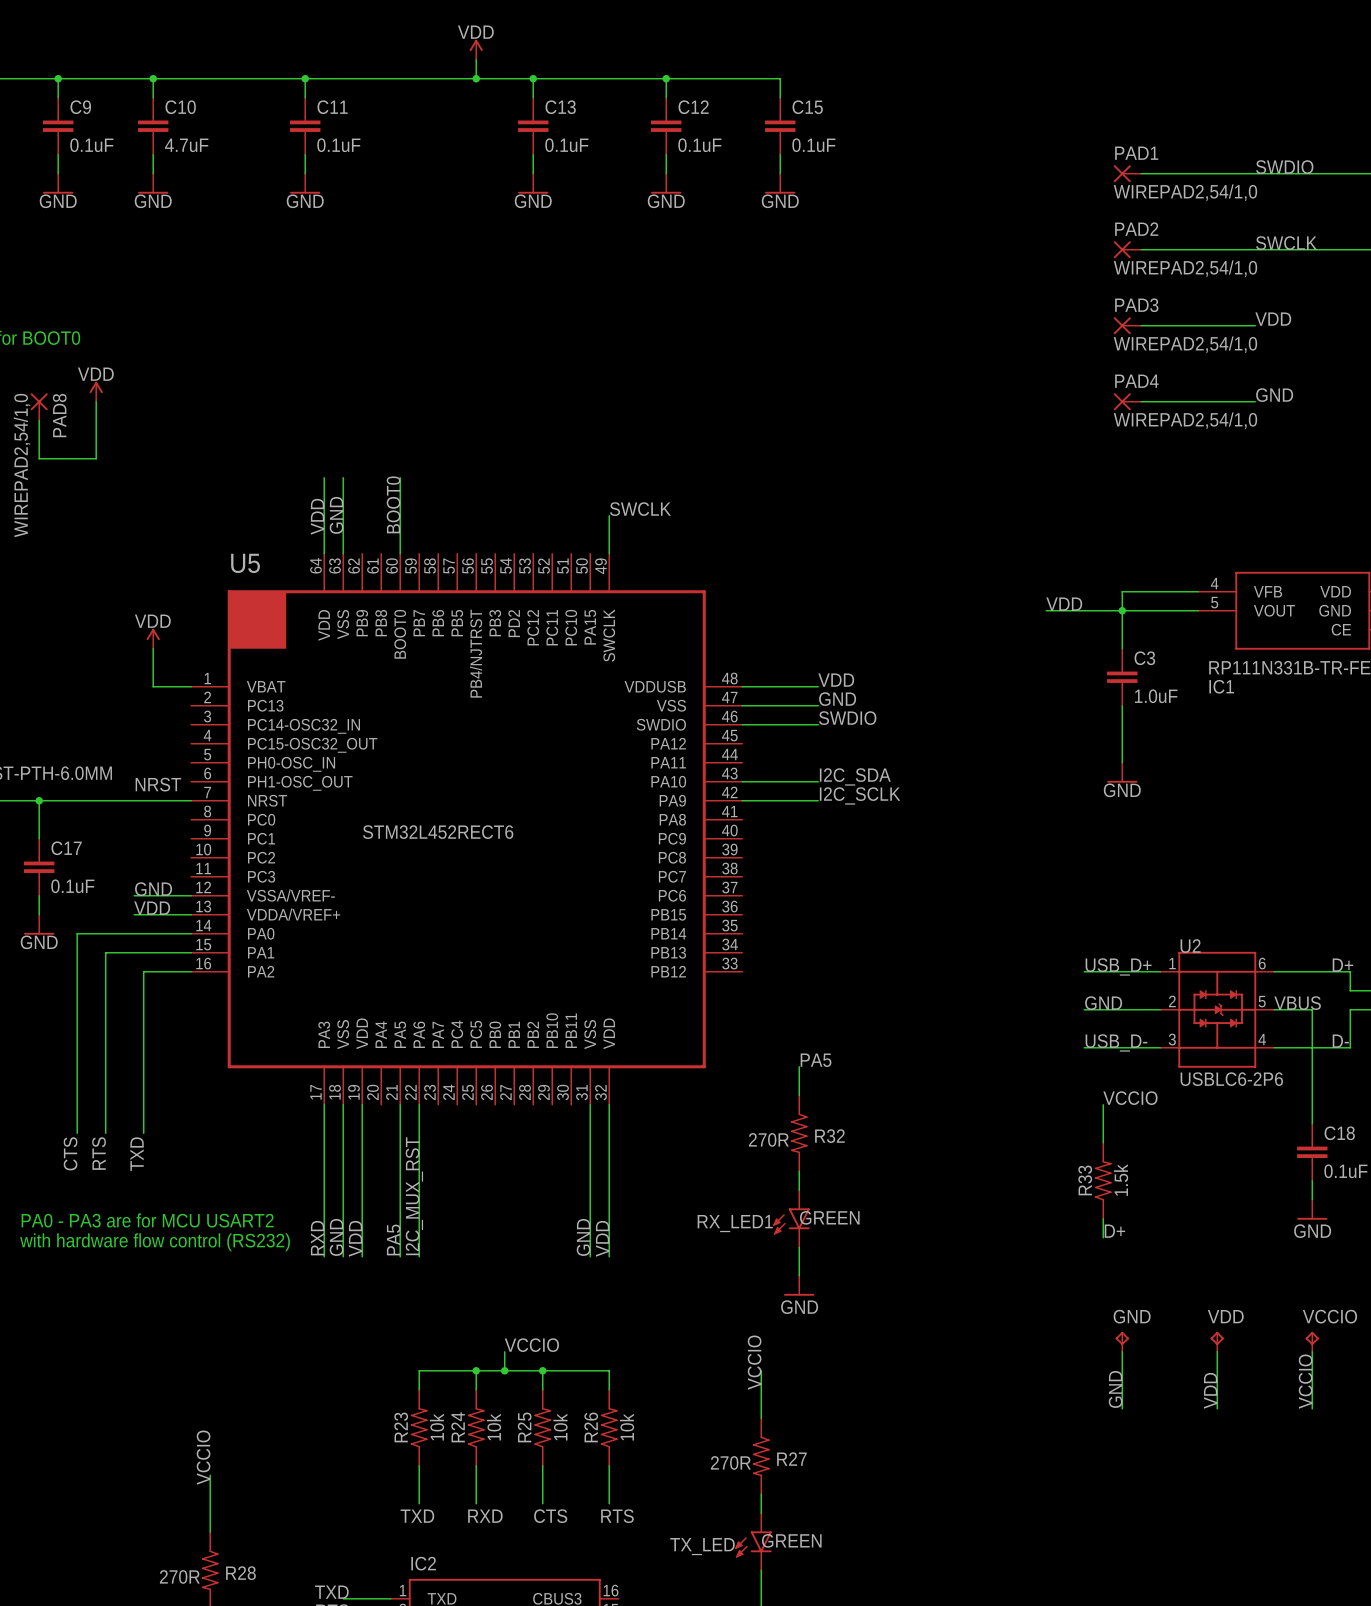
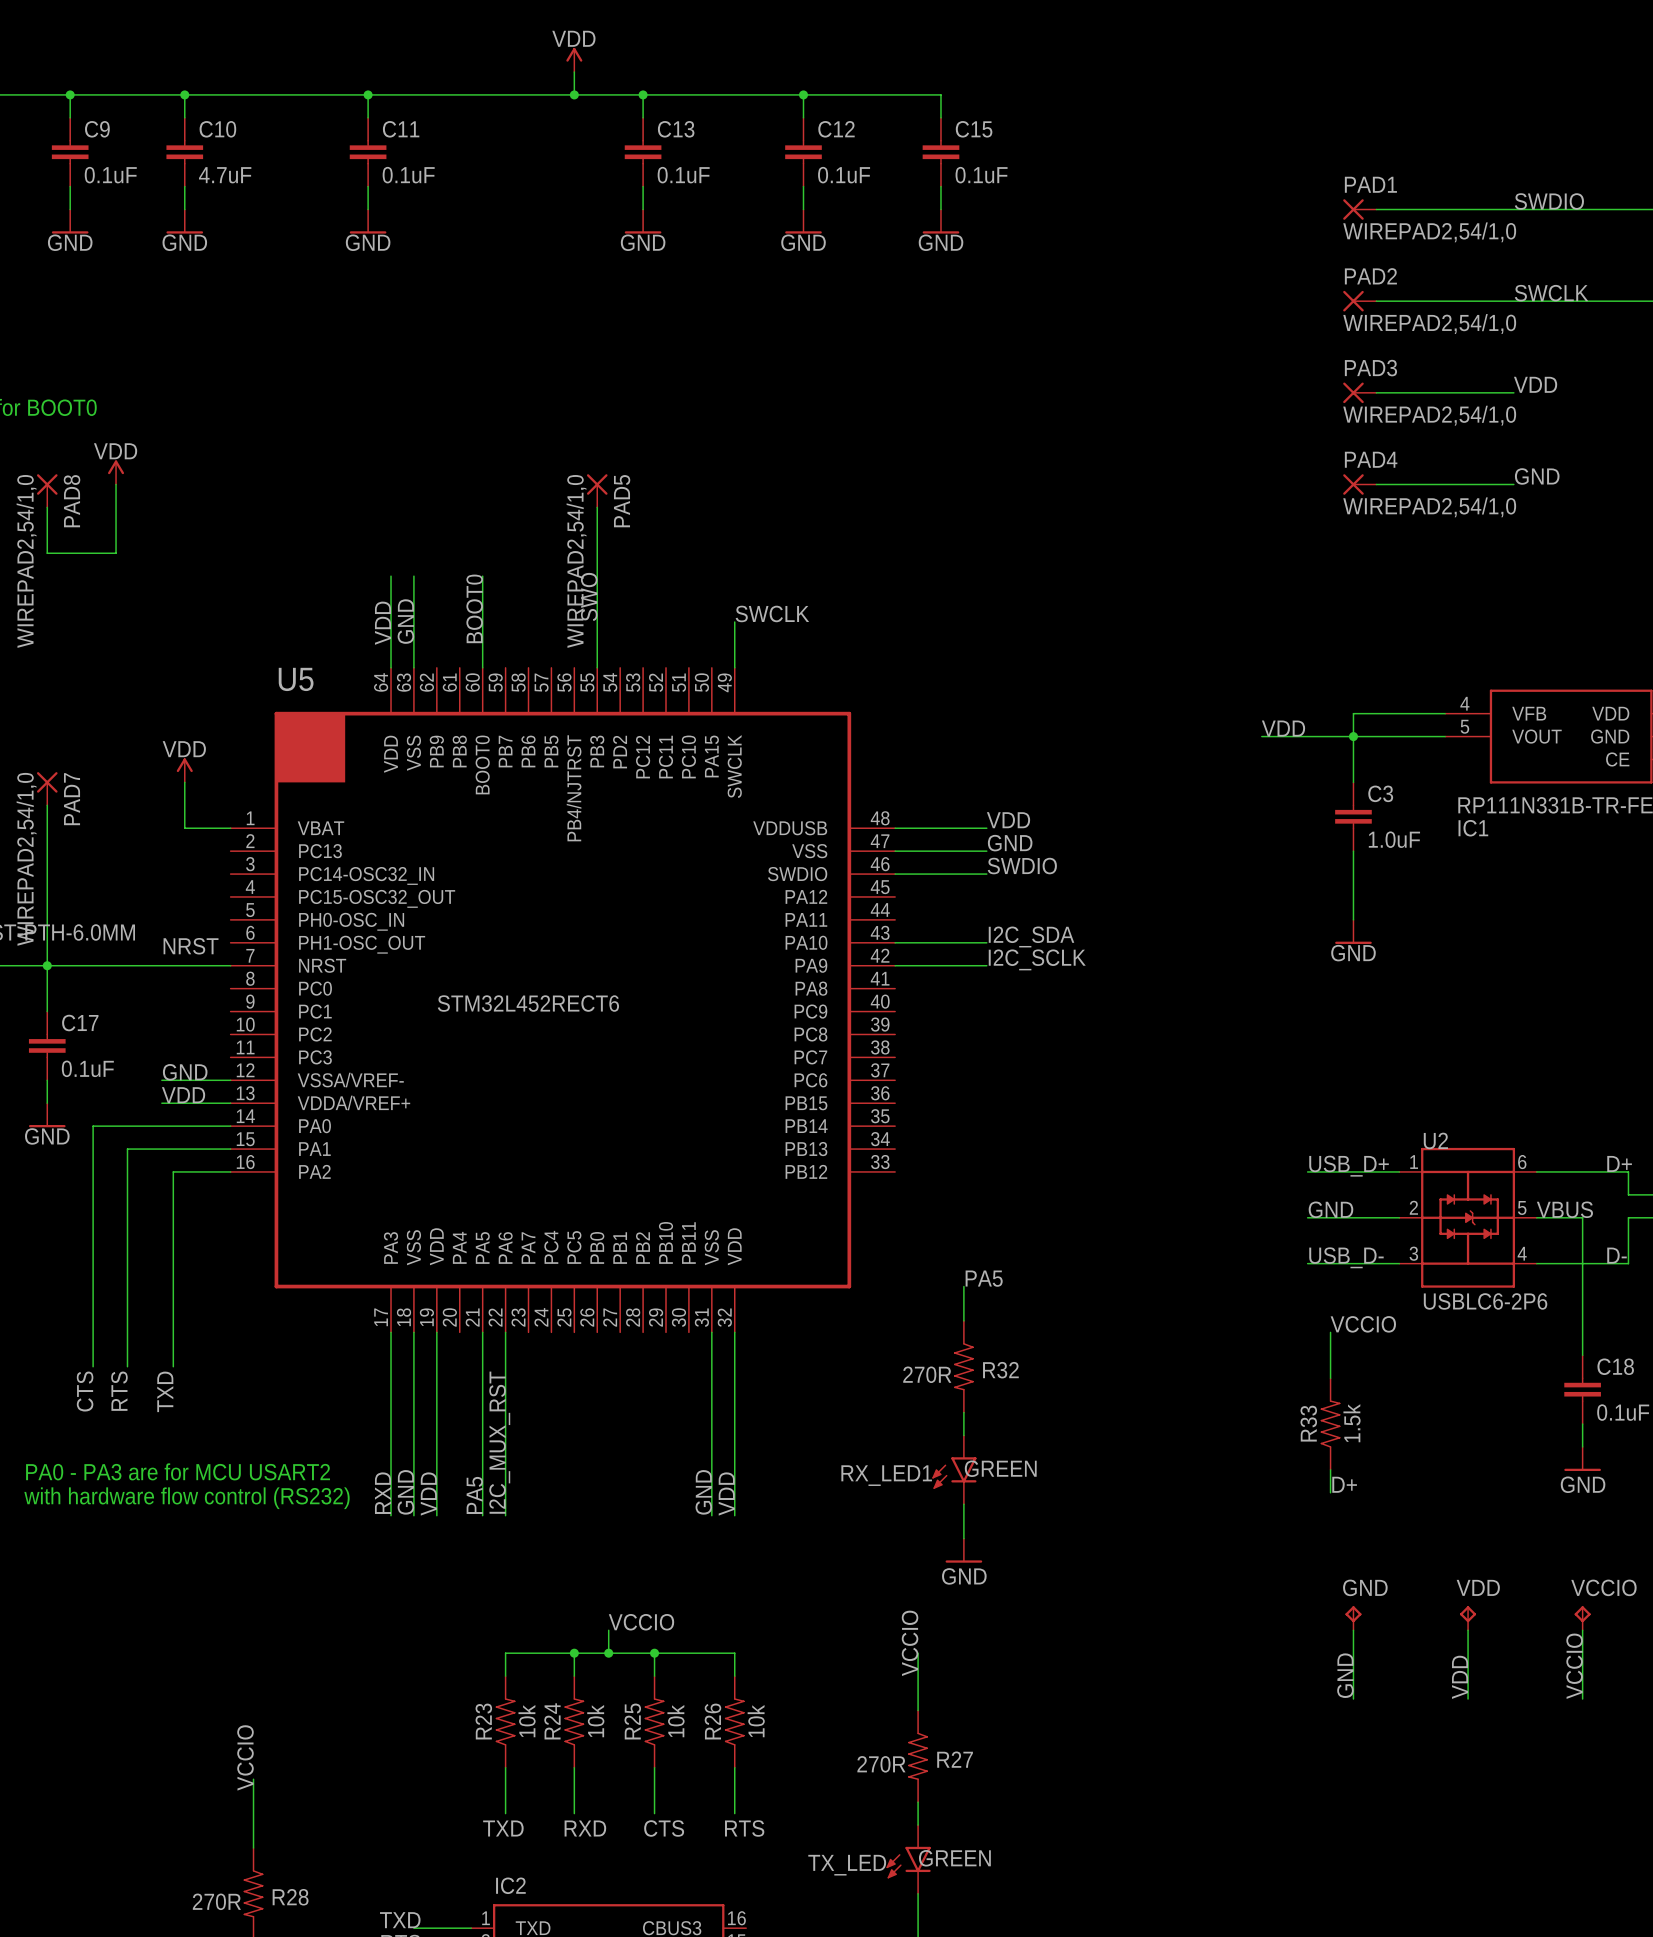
PAD5: none -> WIREPAD2,54/1,0 (597, 490)
wire: none -> (597, 507) (597, 667)
label: none -> SWO (589, 596)
PAD7: none -> WIREPAD2,54/1,0 (47, 788)
wire: none -> (47, 805) (47, 965)

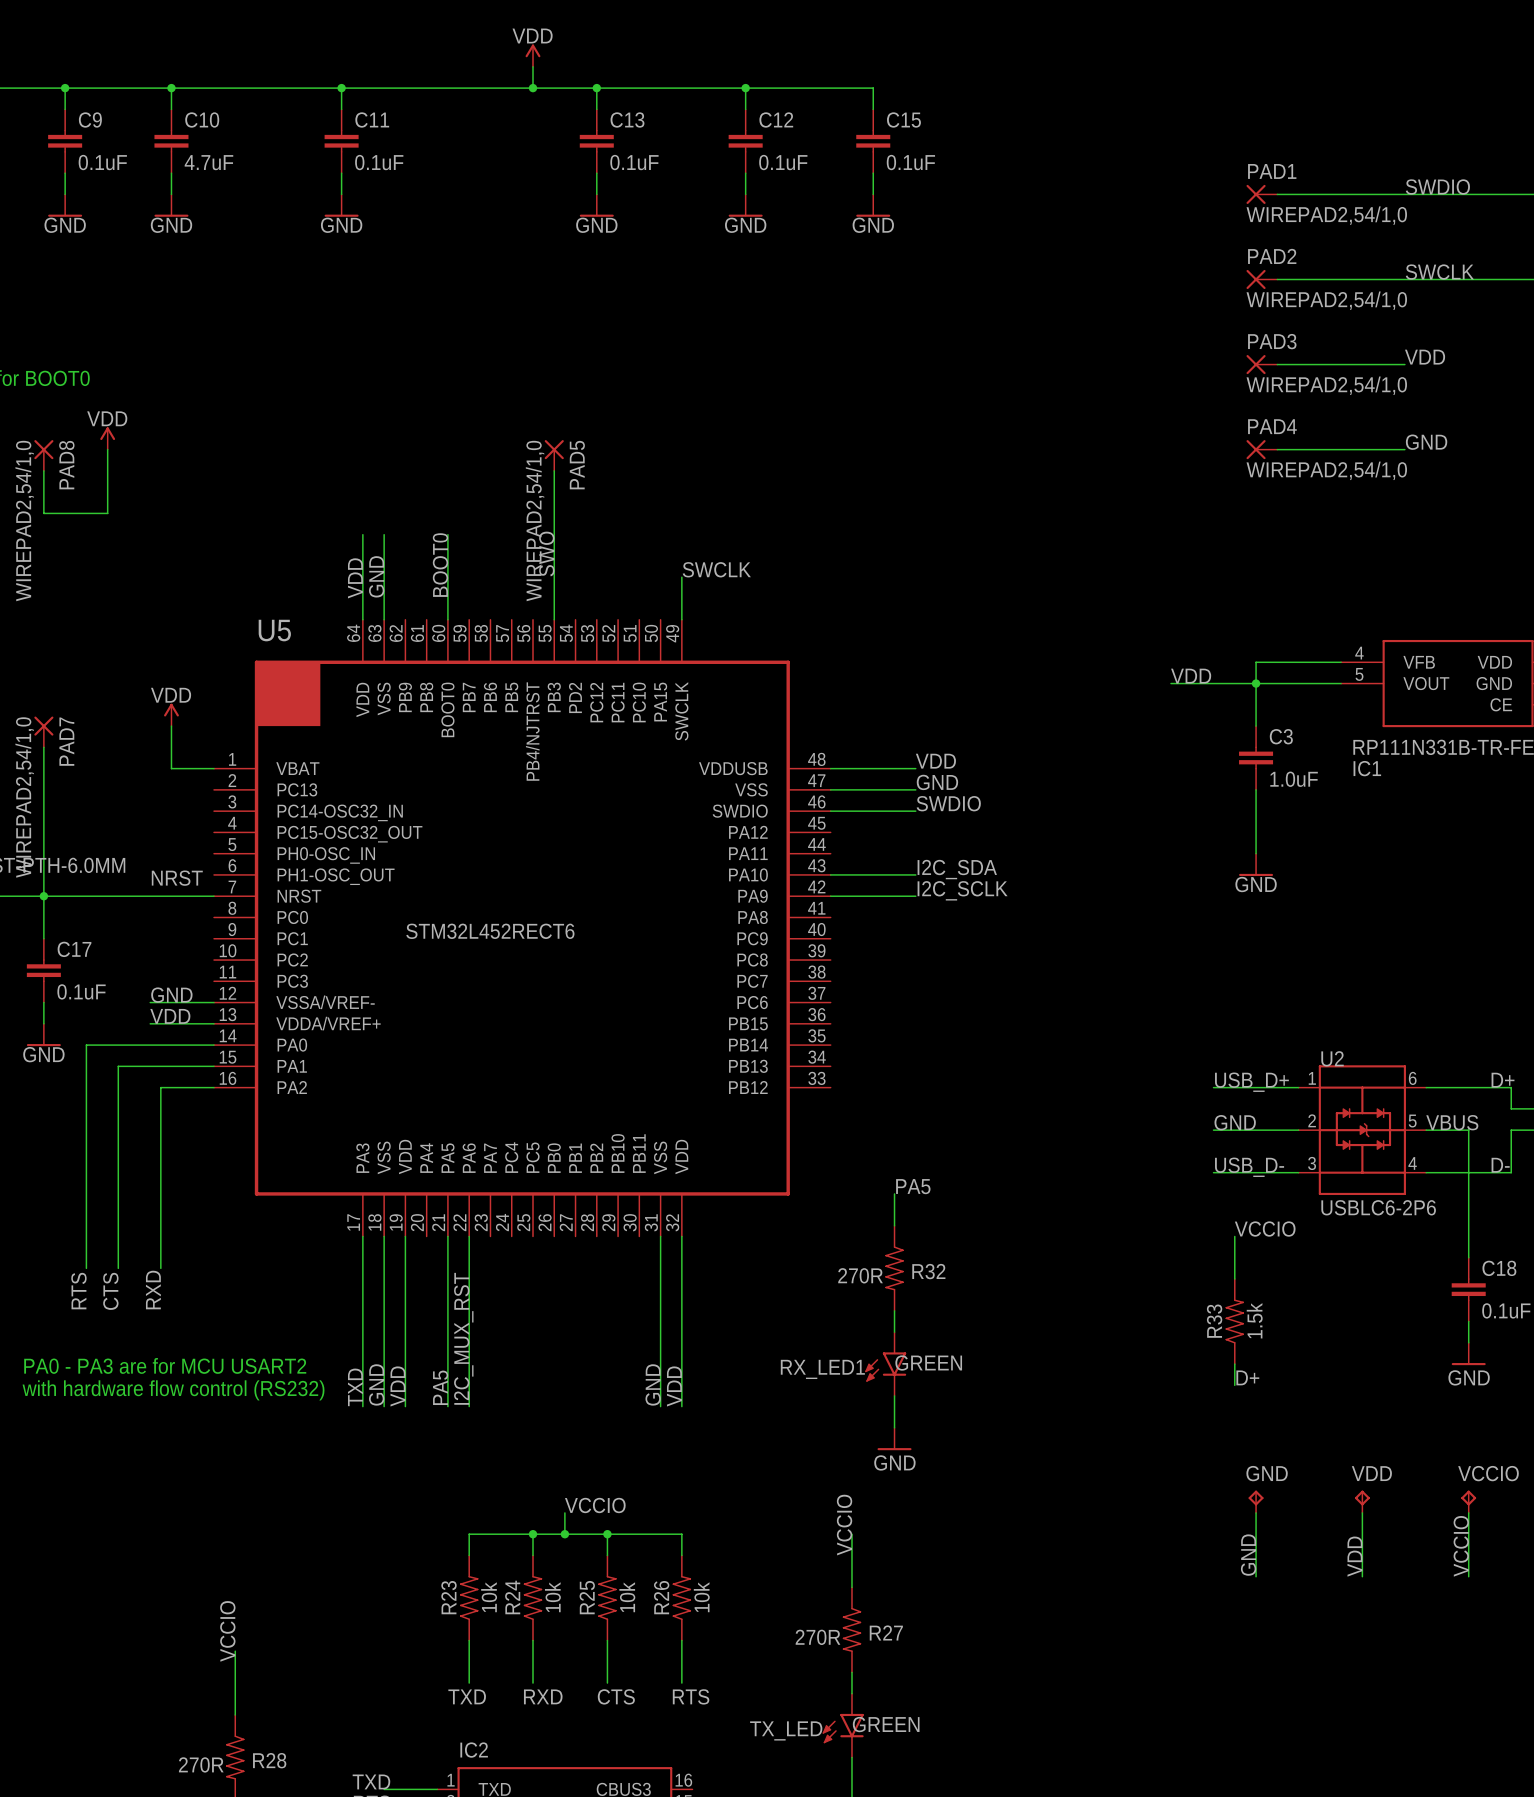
label: CTS (85, 1391) -> RTS (78, 1291)
label: RTS (119, 1391) -> CTS (110, 1291)
label: TXD (165, 1391) -> RXD (153, 1290)
label: RXD (382, 1493) -> TXD (355, 1387)

